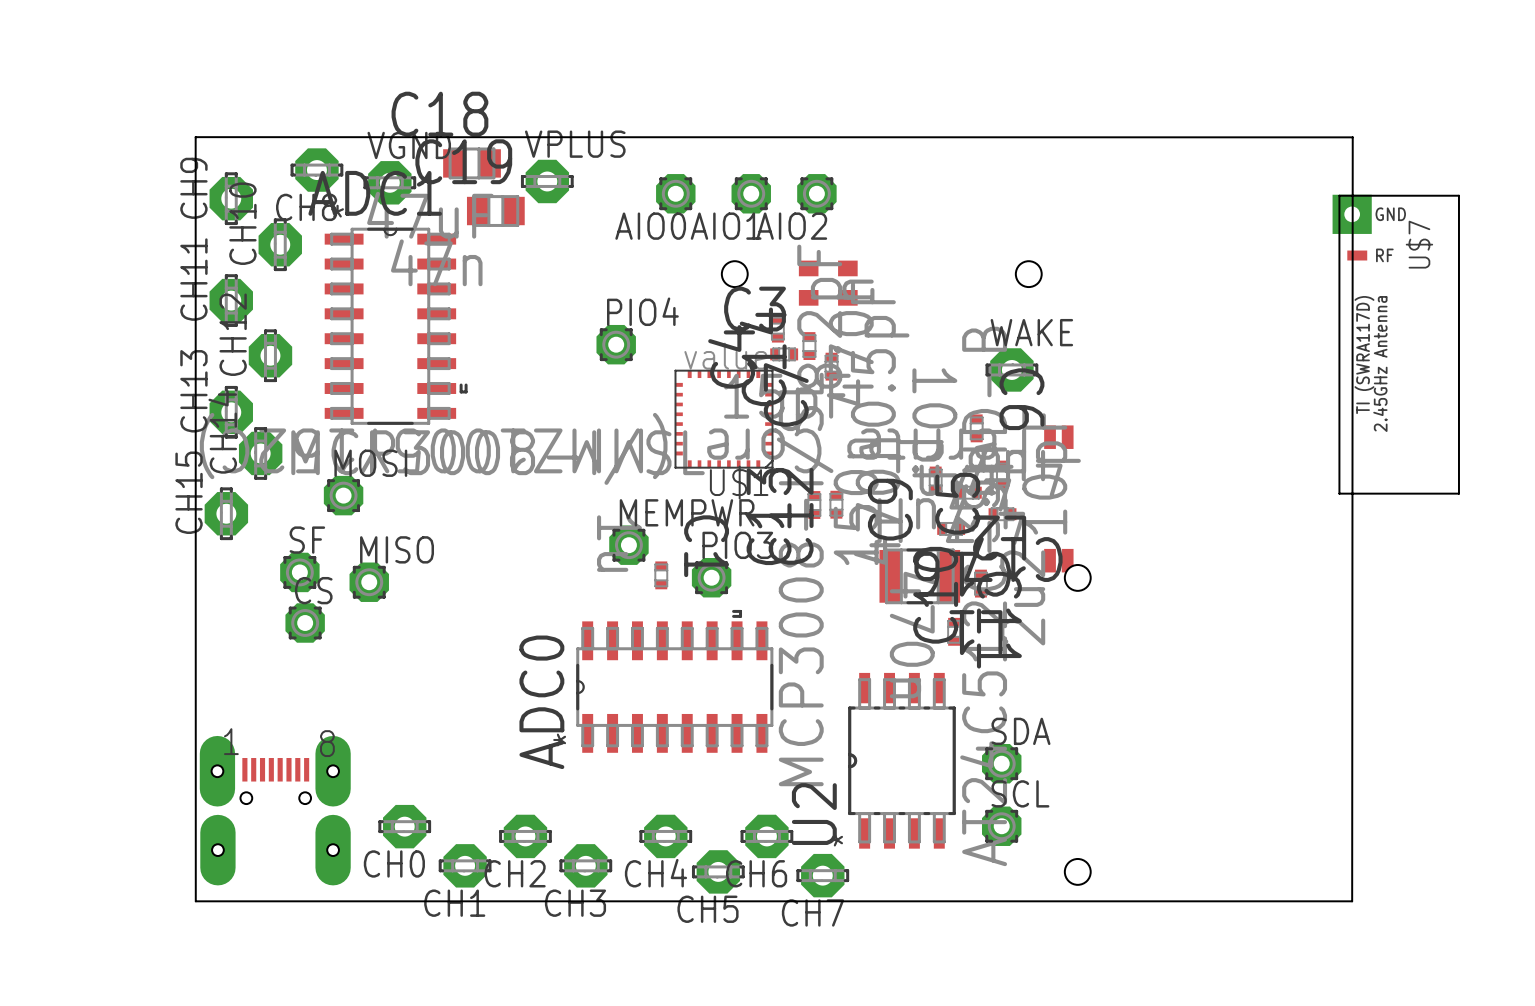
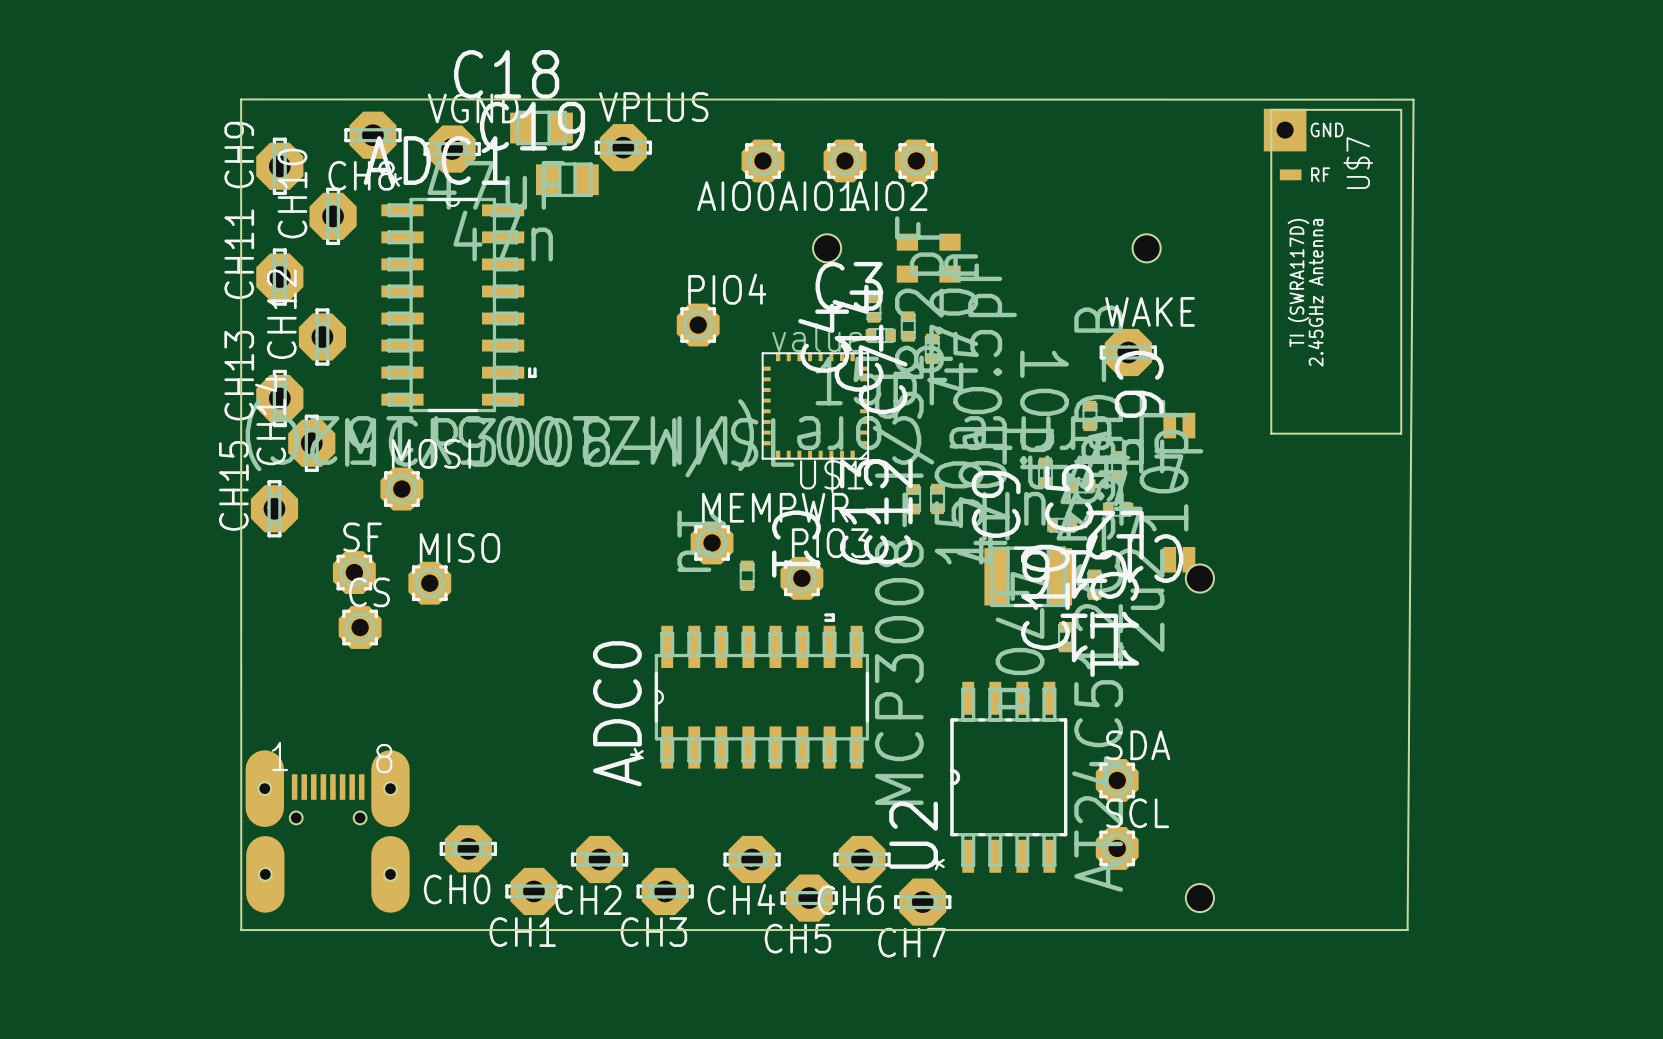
board edge: (1274, 137) (1352, 137) (1352, 901) (1268, 901) -> (1413, 99) (1407, 930)
U$7 position: (1395, 344) -> (1332, 271)

